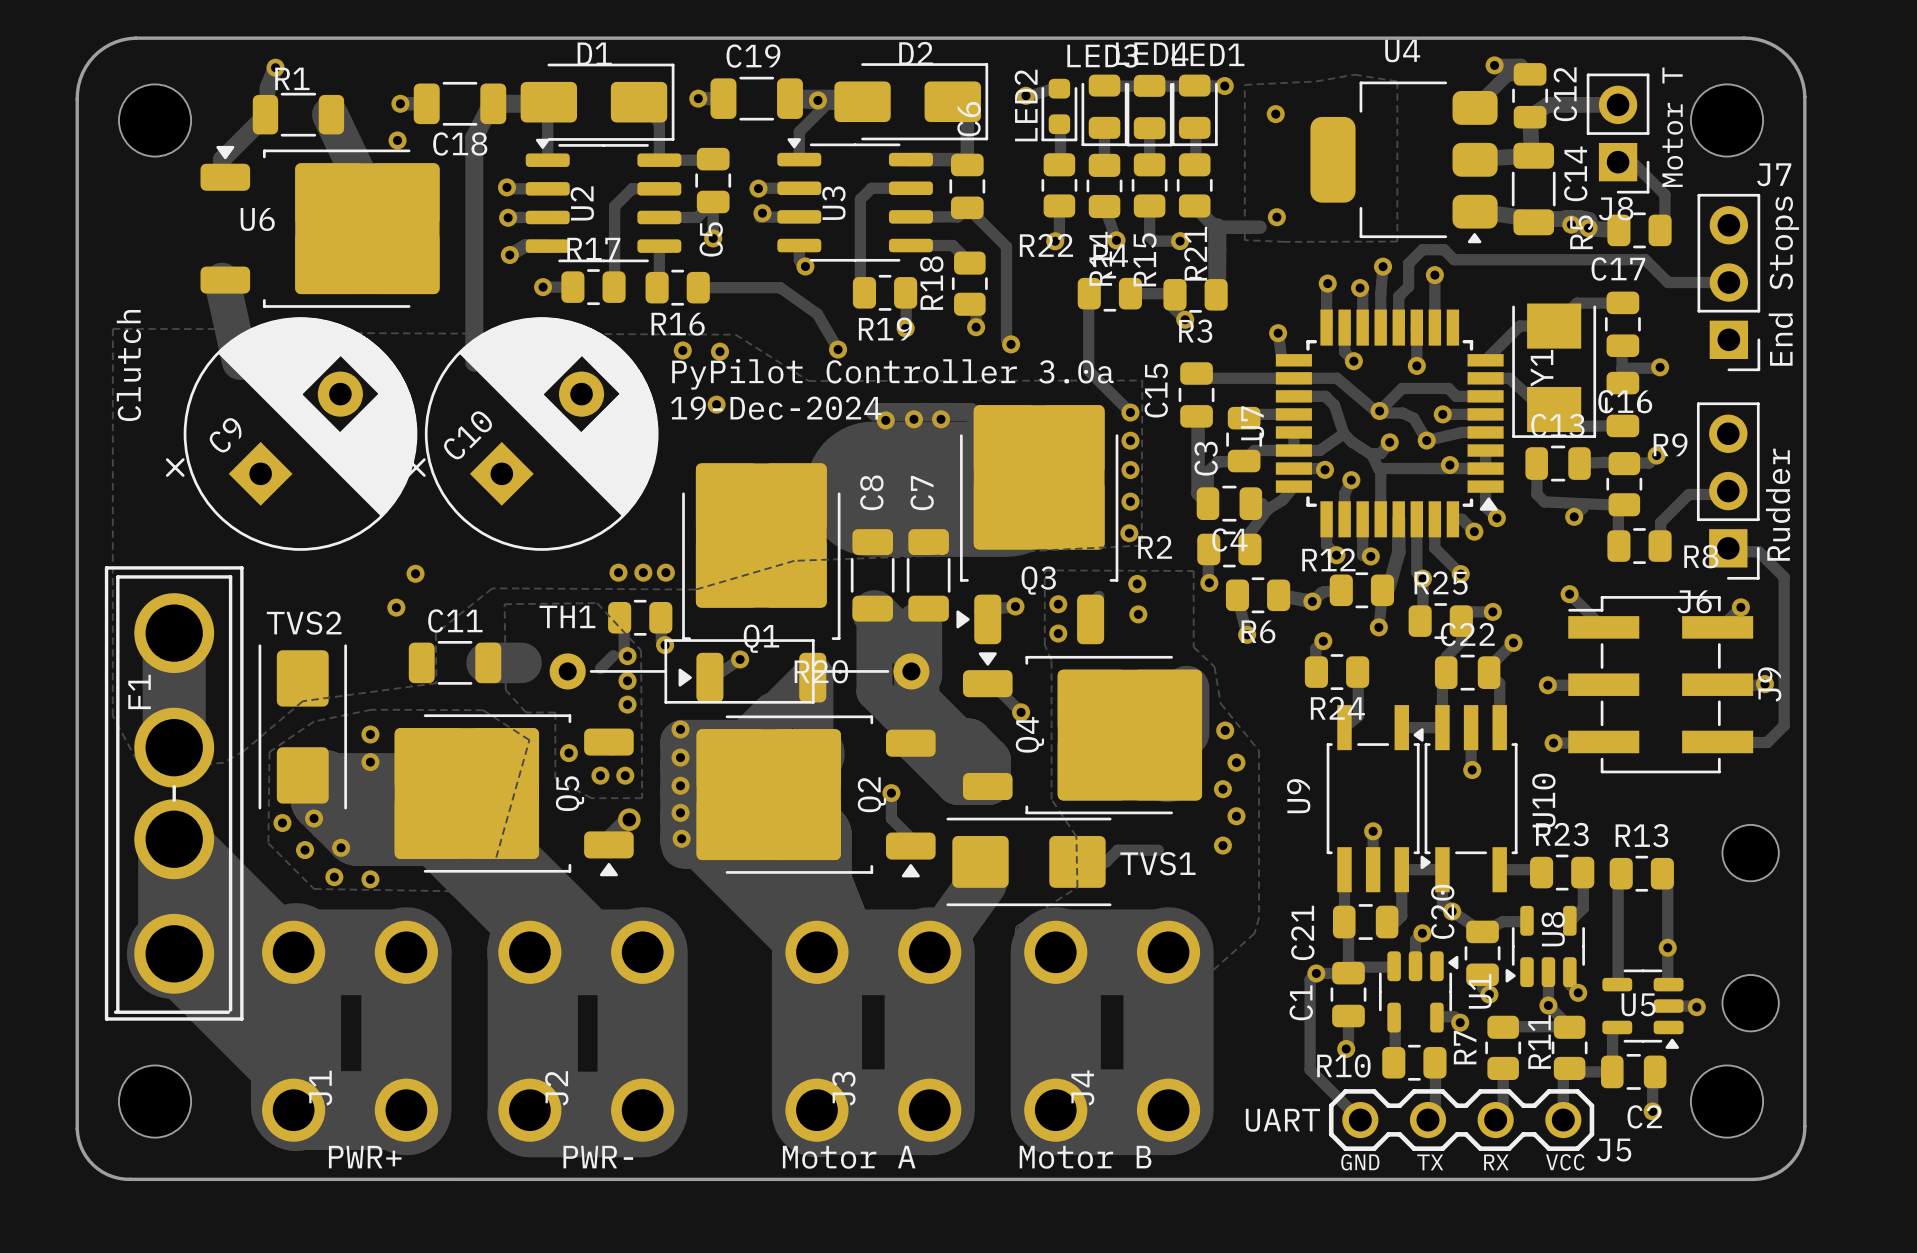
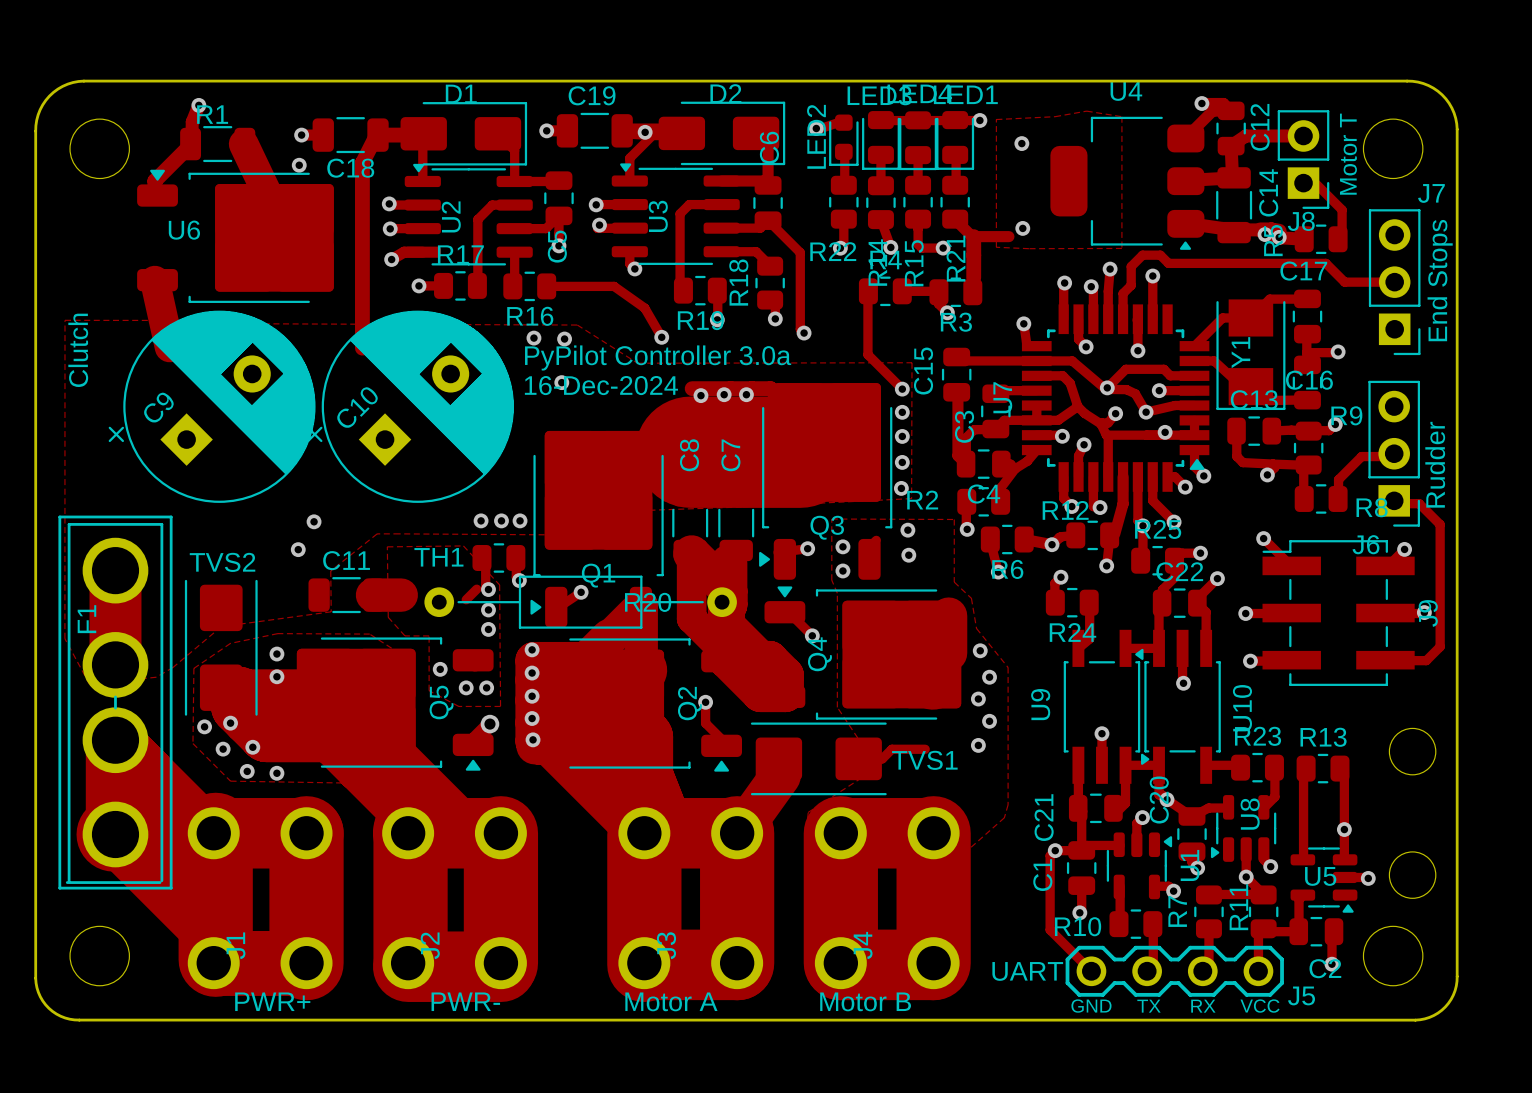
text: 19-Dec-2024 (776, 408) -> 16-Dec-2024 (601, 385)

